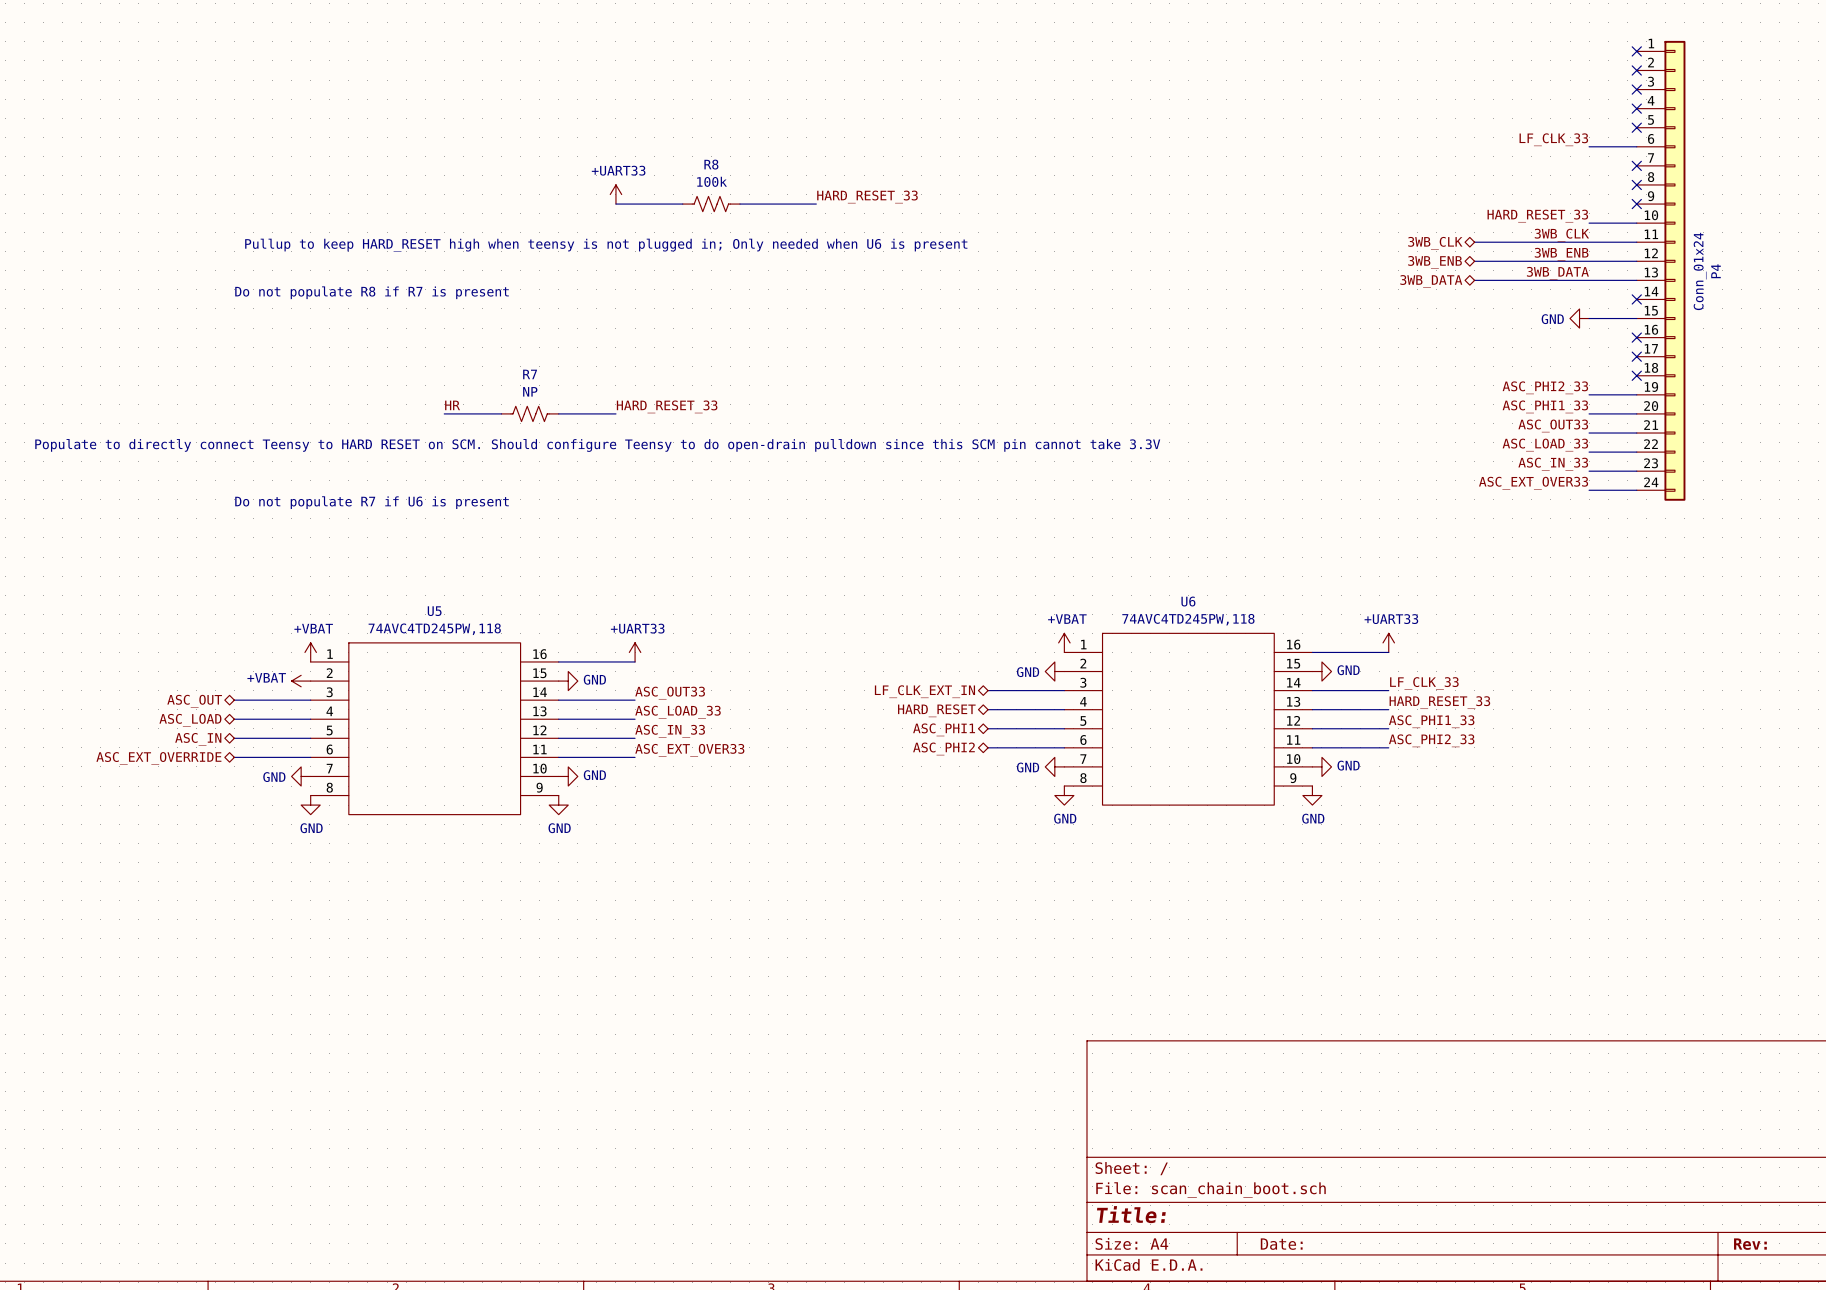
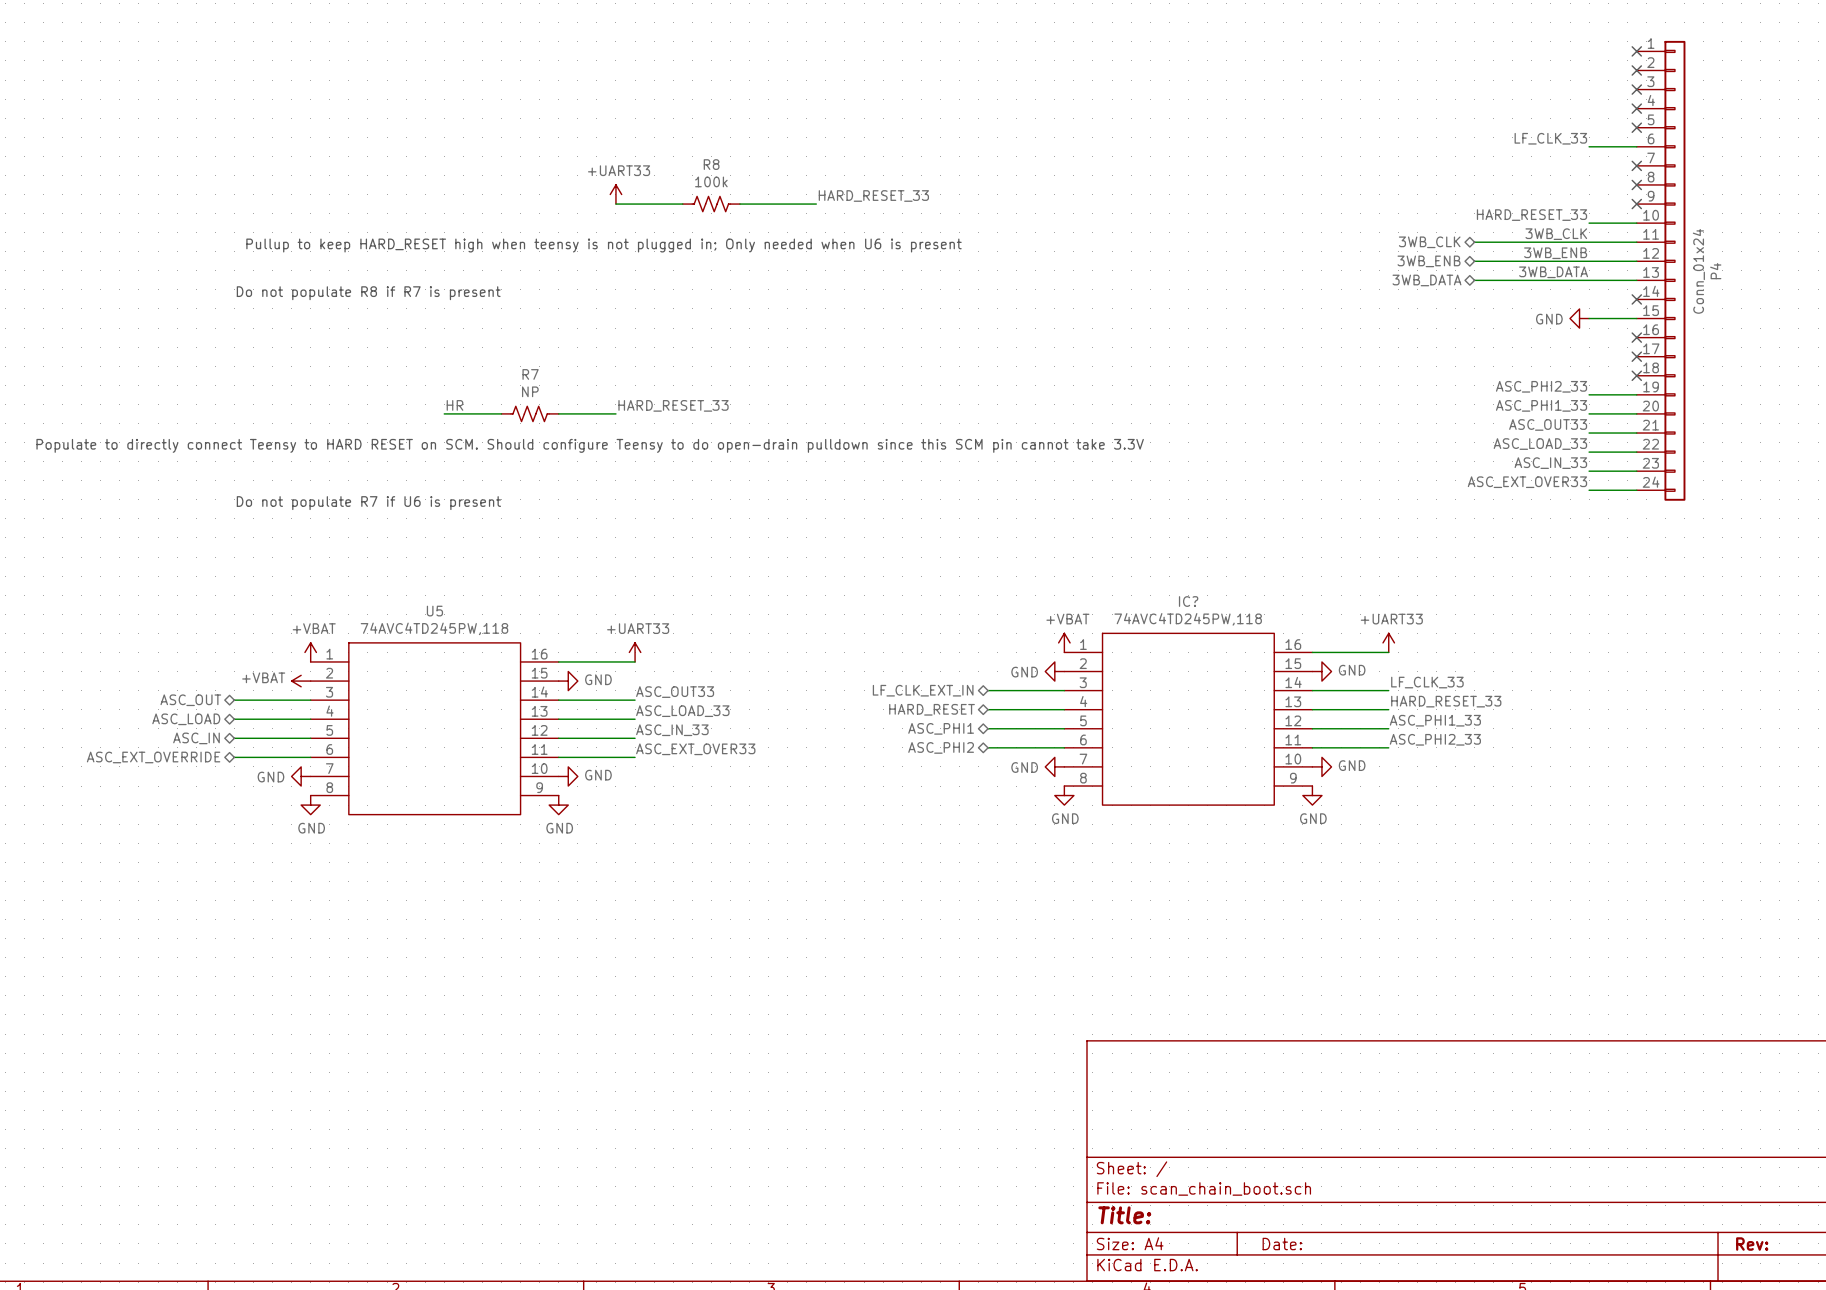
U6 name: U6 (1188, 601) -> IC? (1188, 601)

